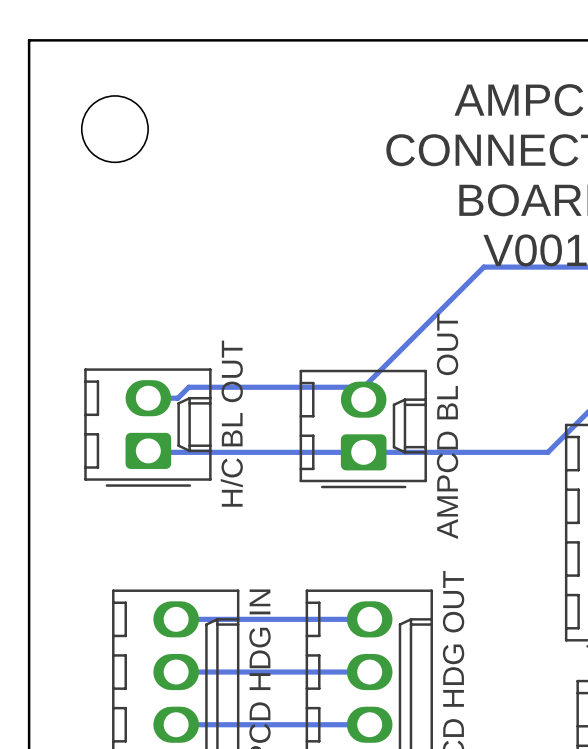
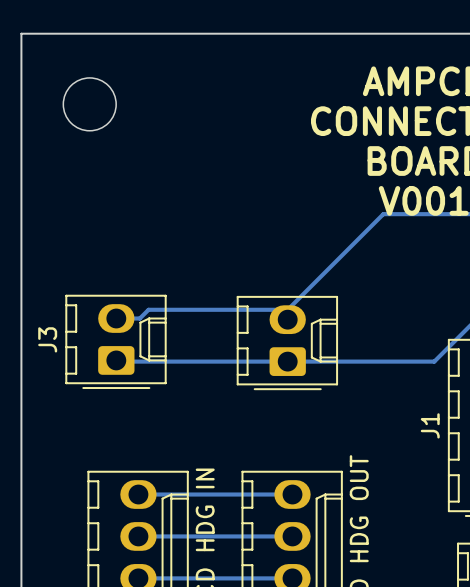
J3 value: H/C BL OUT (231, 423) -> none
J3 name: none -> J3 (47, 339)
part value: AMPCD BL OUT (447, 426) -> none
J1 name: none -> J1 (430, 425)

